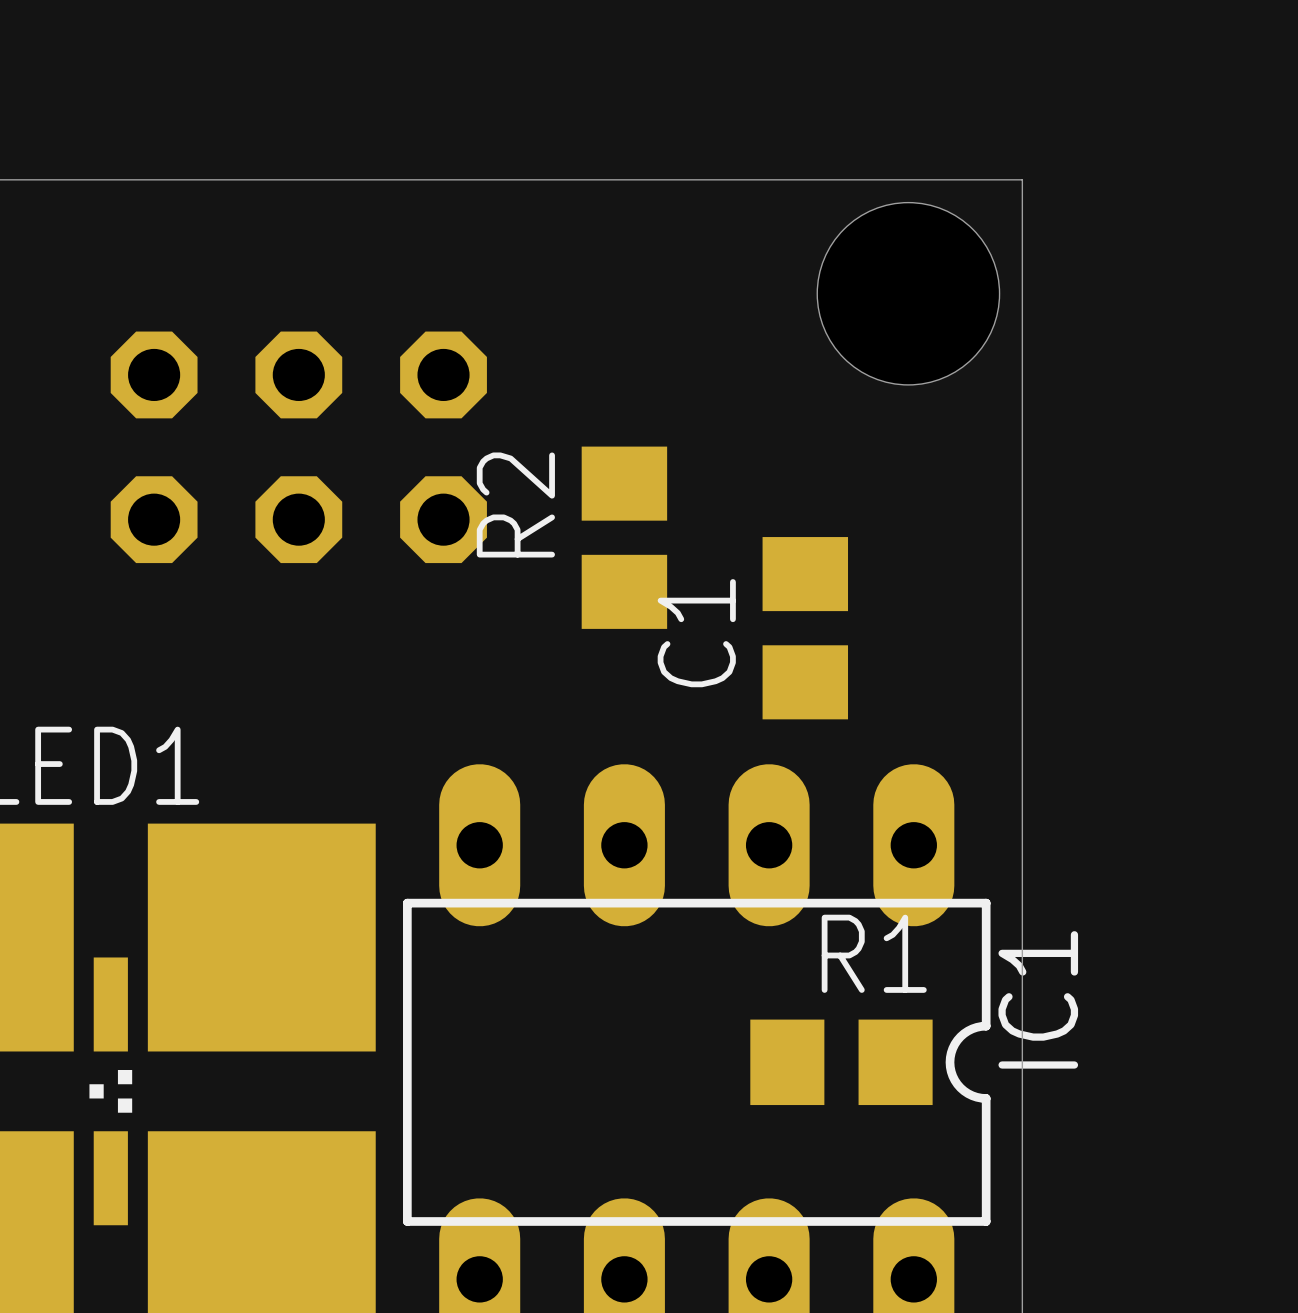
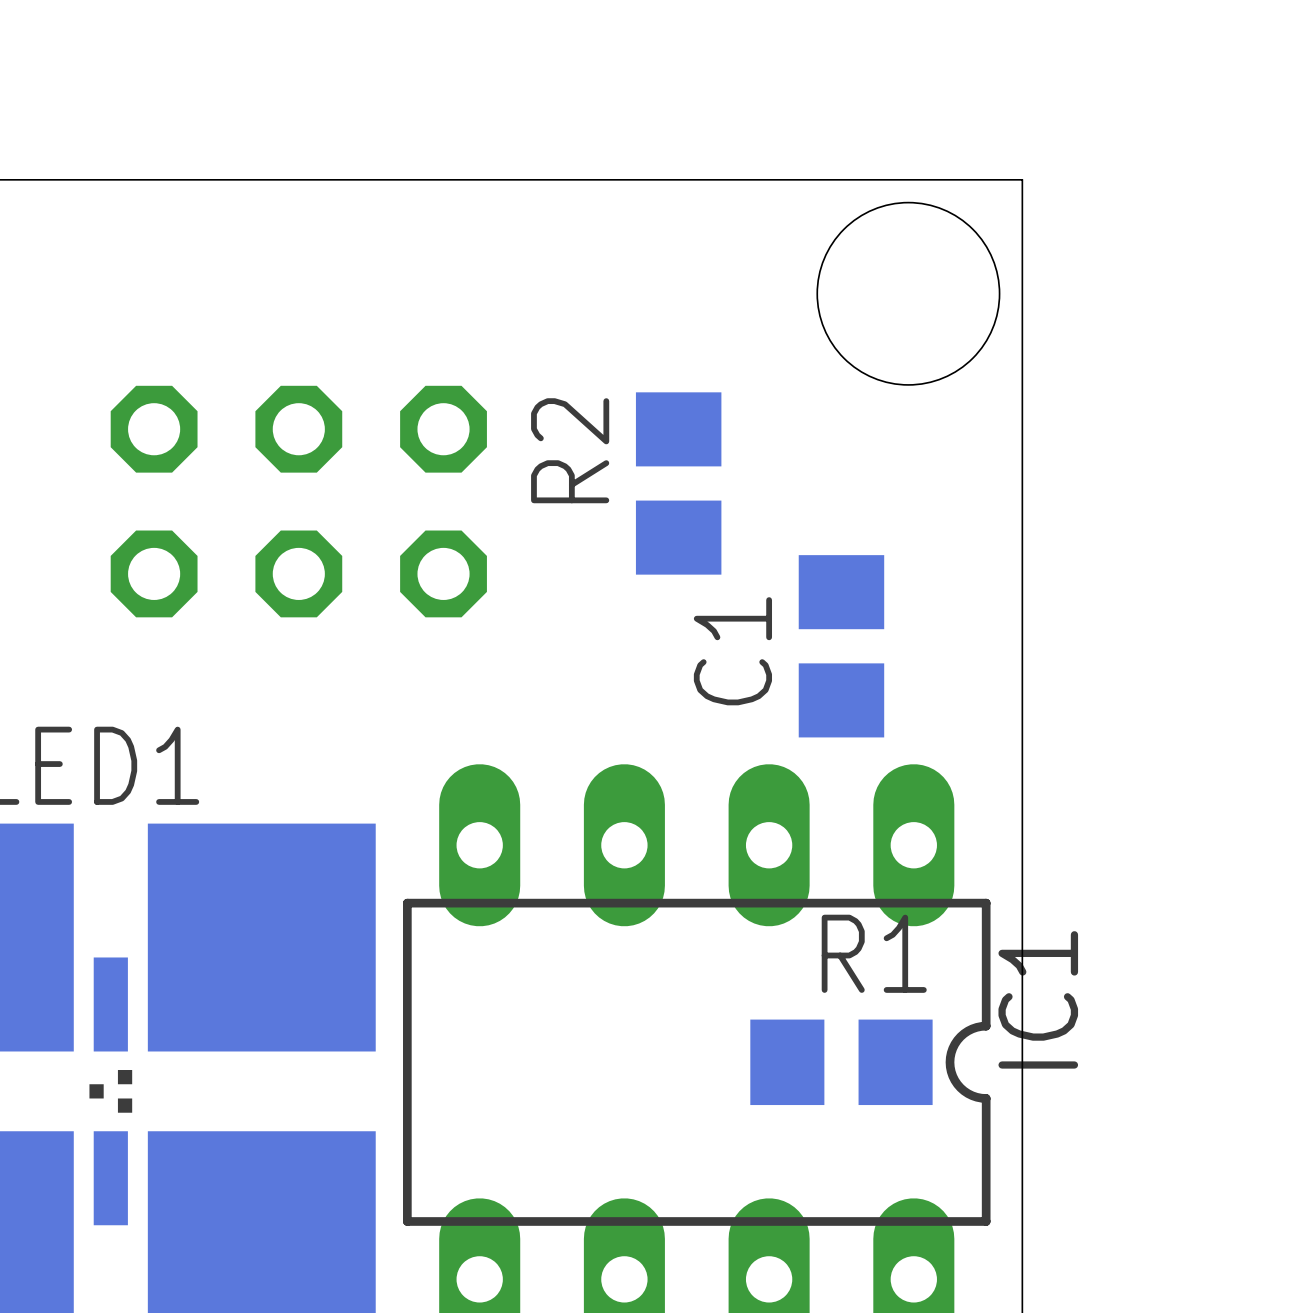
part position: (298, 447) -> (298, 501)
R2 position: (624, 537) -> (678, 483)
C1 position: (805, 628) -> (841, 646)

